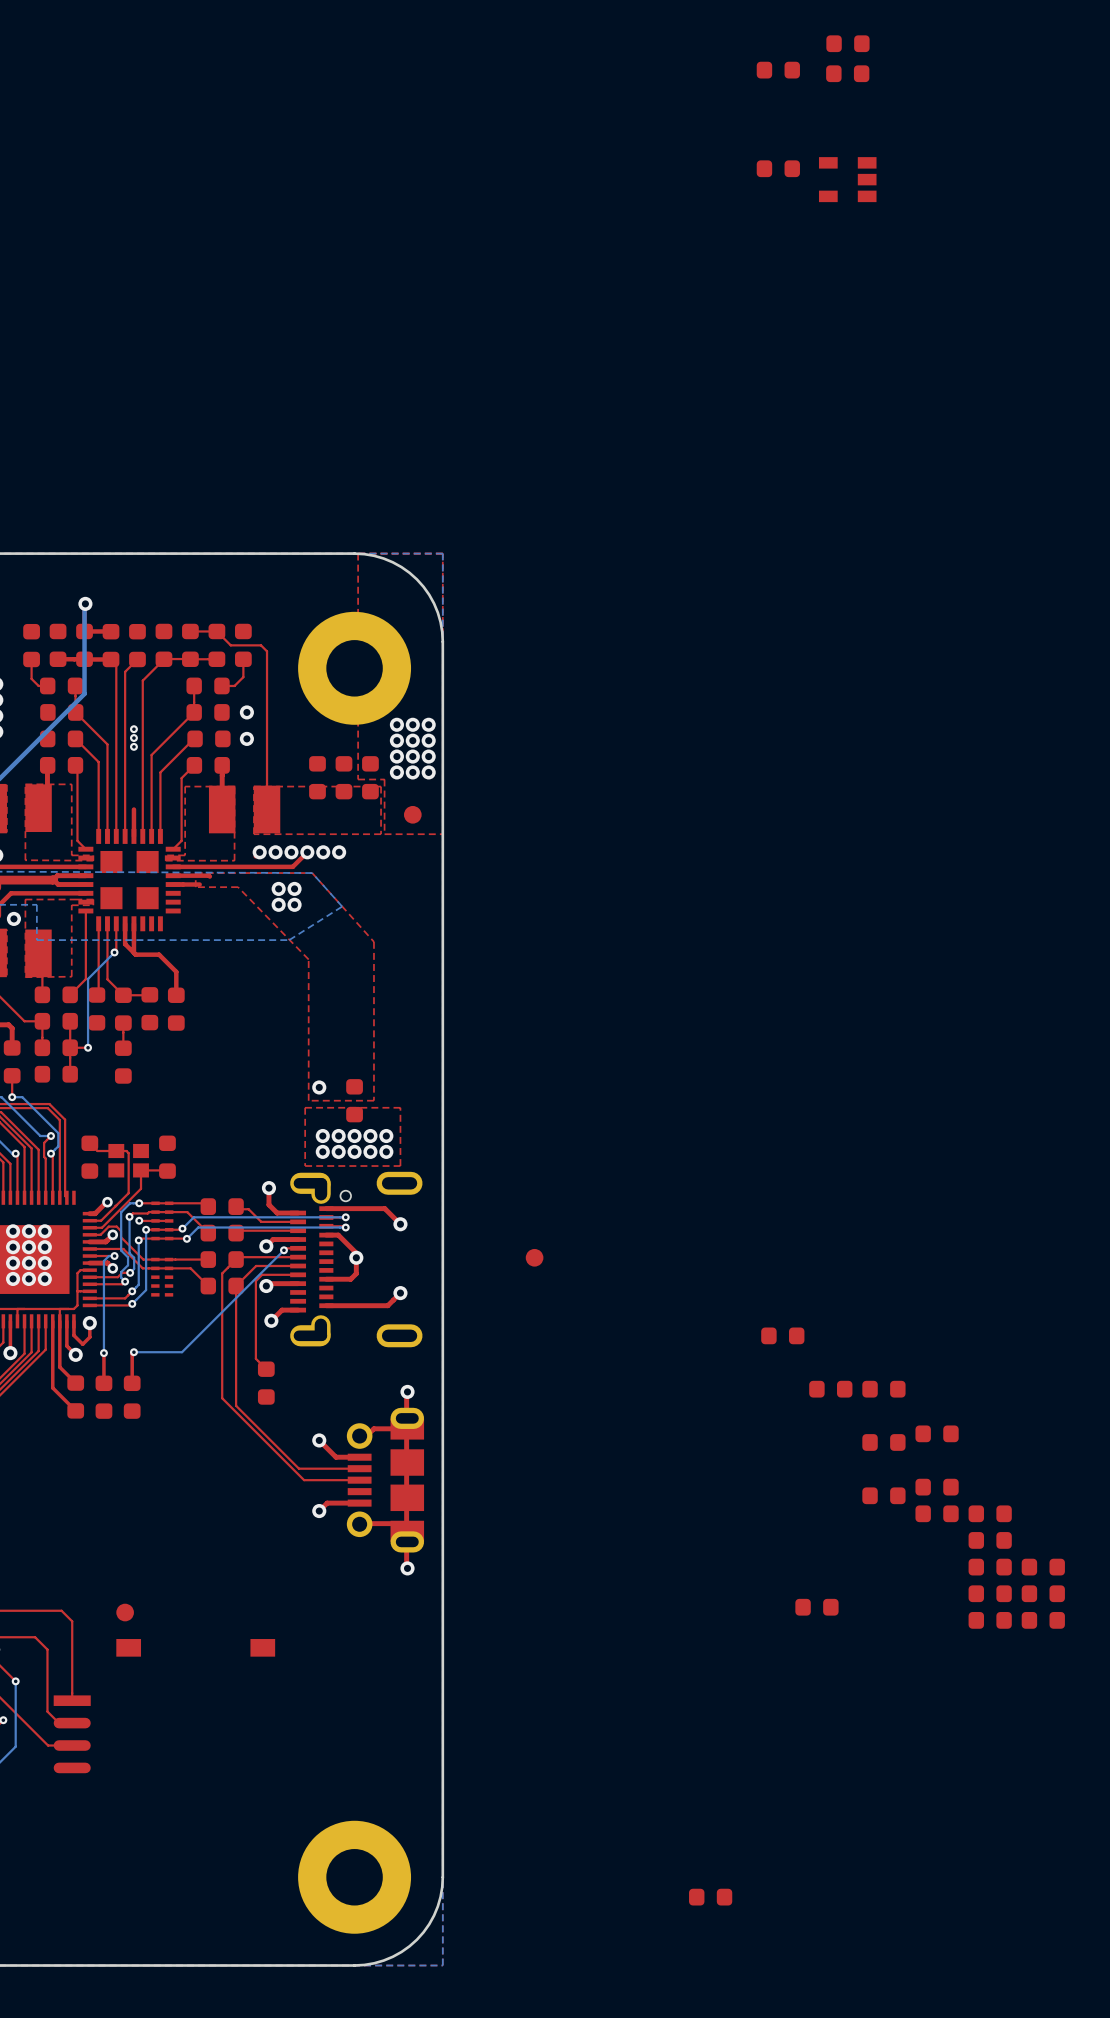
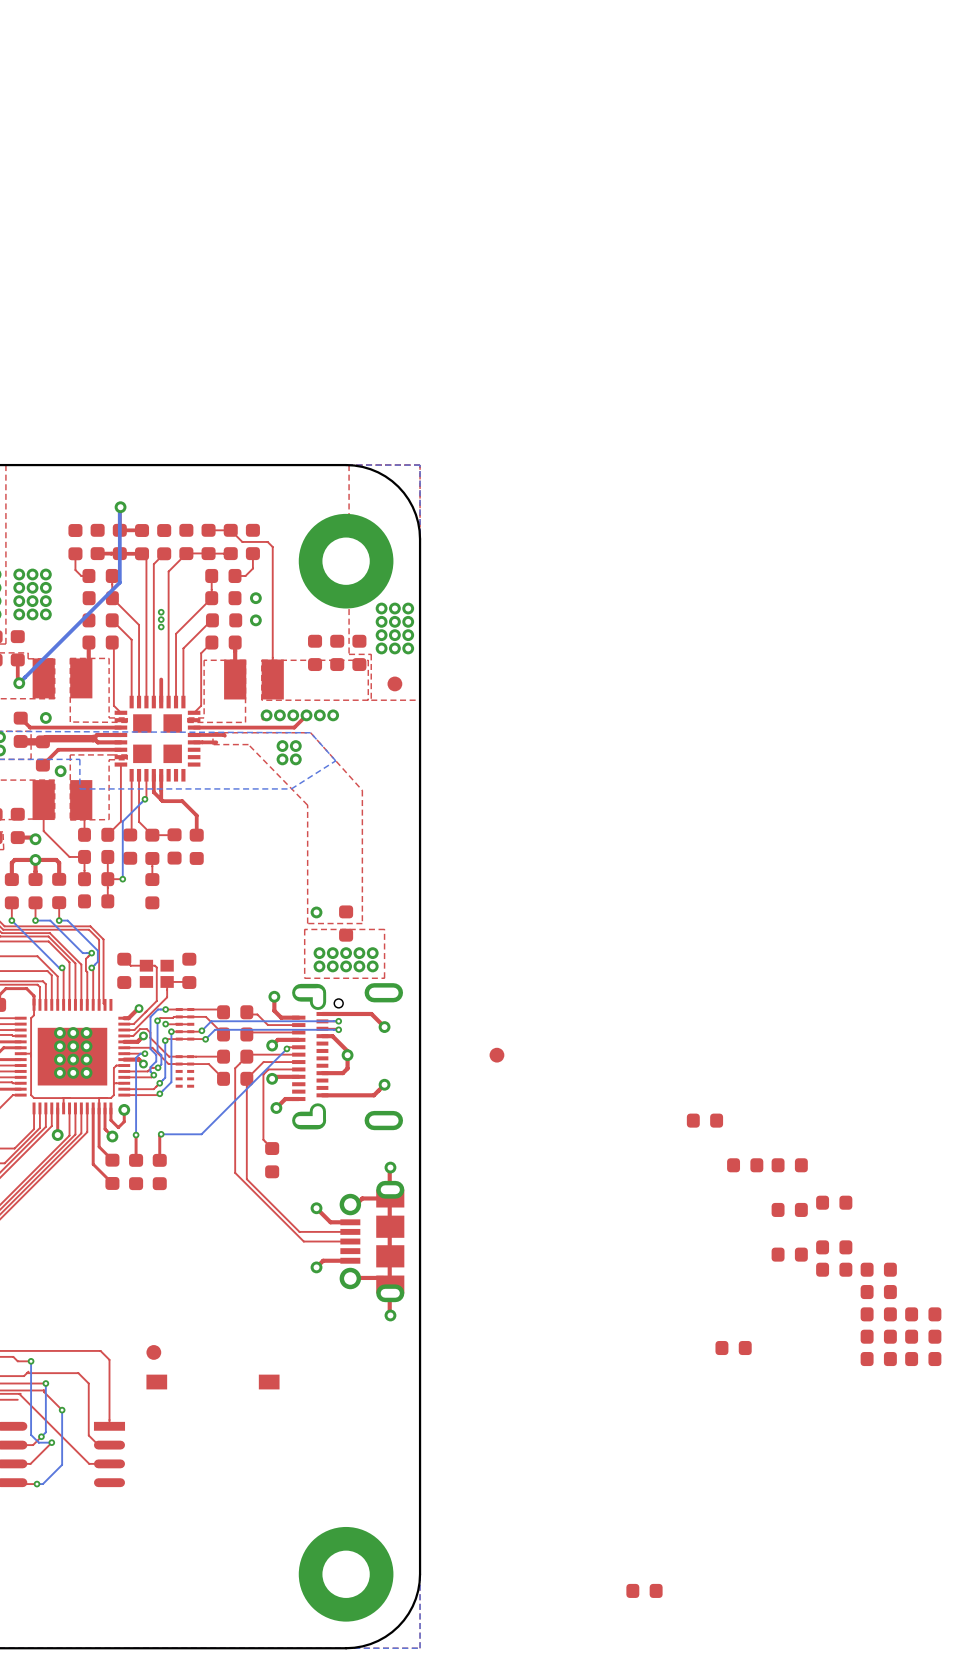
part: (847, 43) -> none
part: (778, 70) -> none
part: (847, 73) -> none
part: (778, 168) -> none
part: (847, 179) -> none

